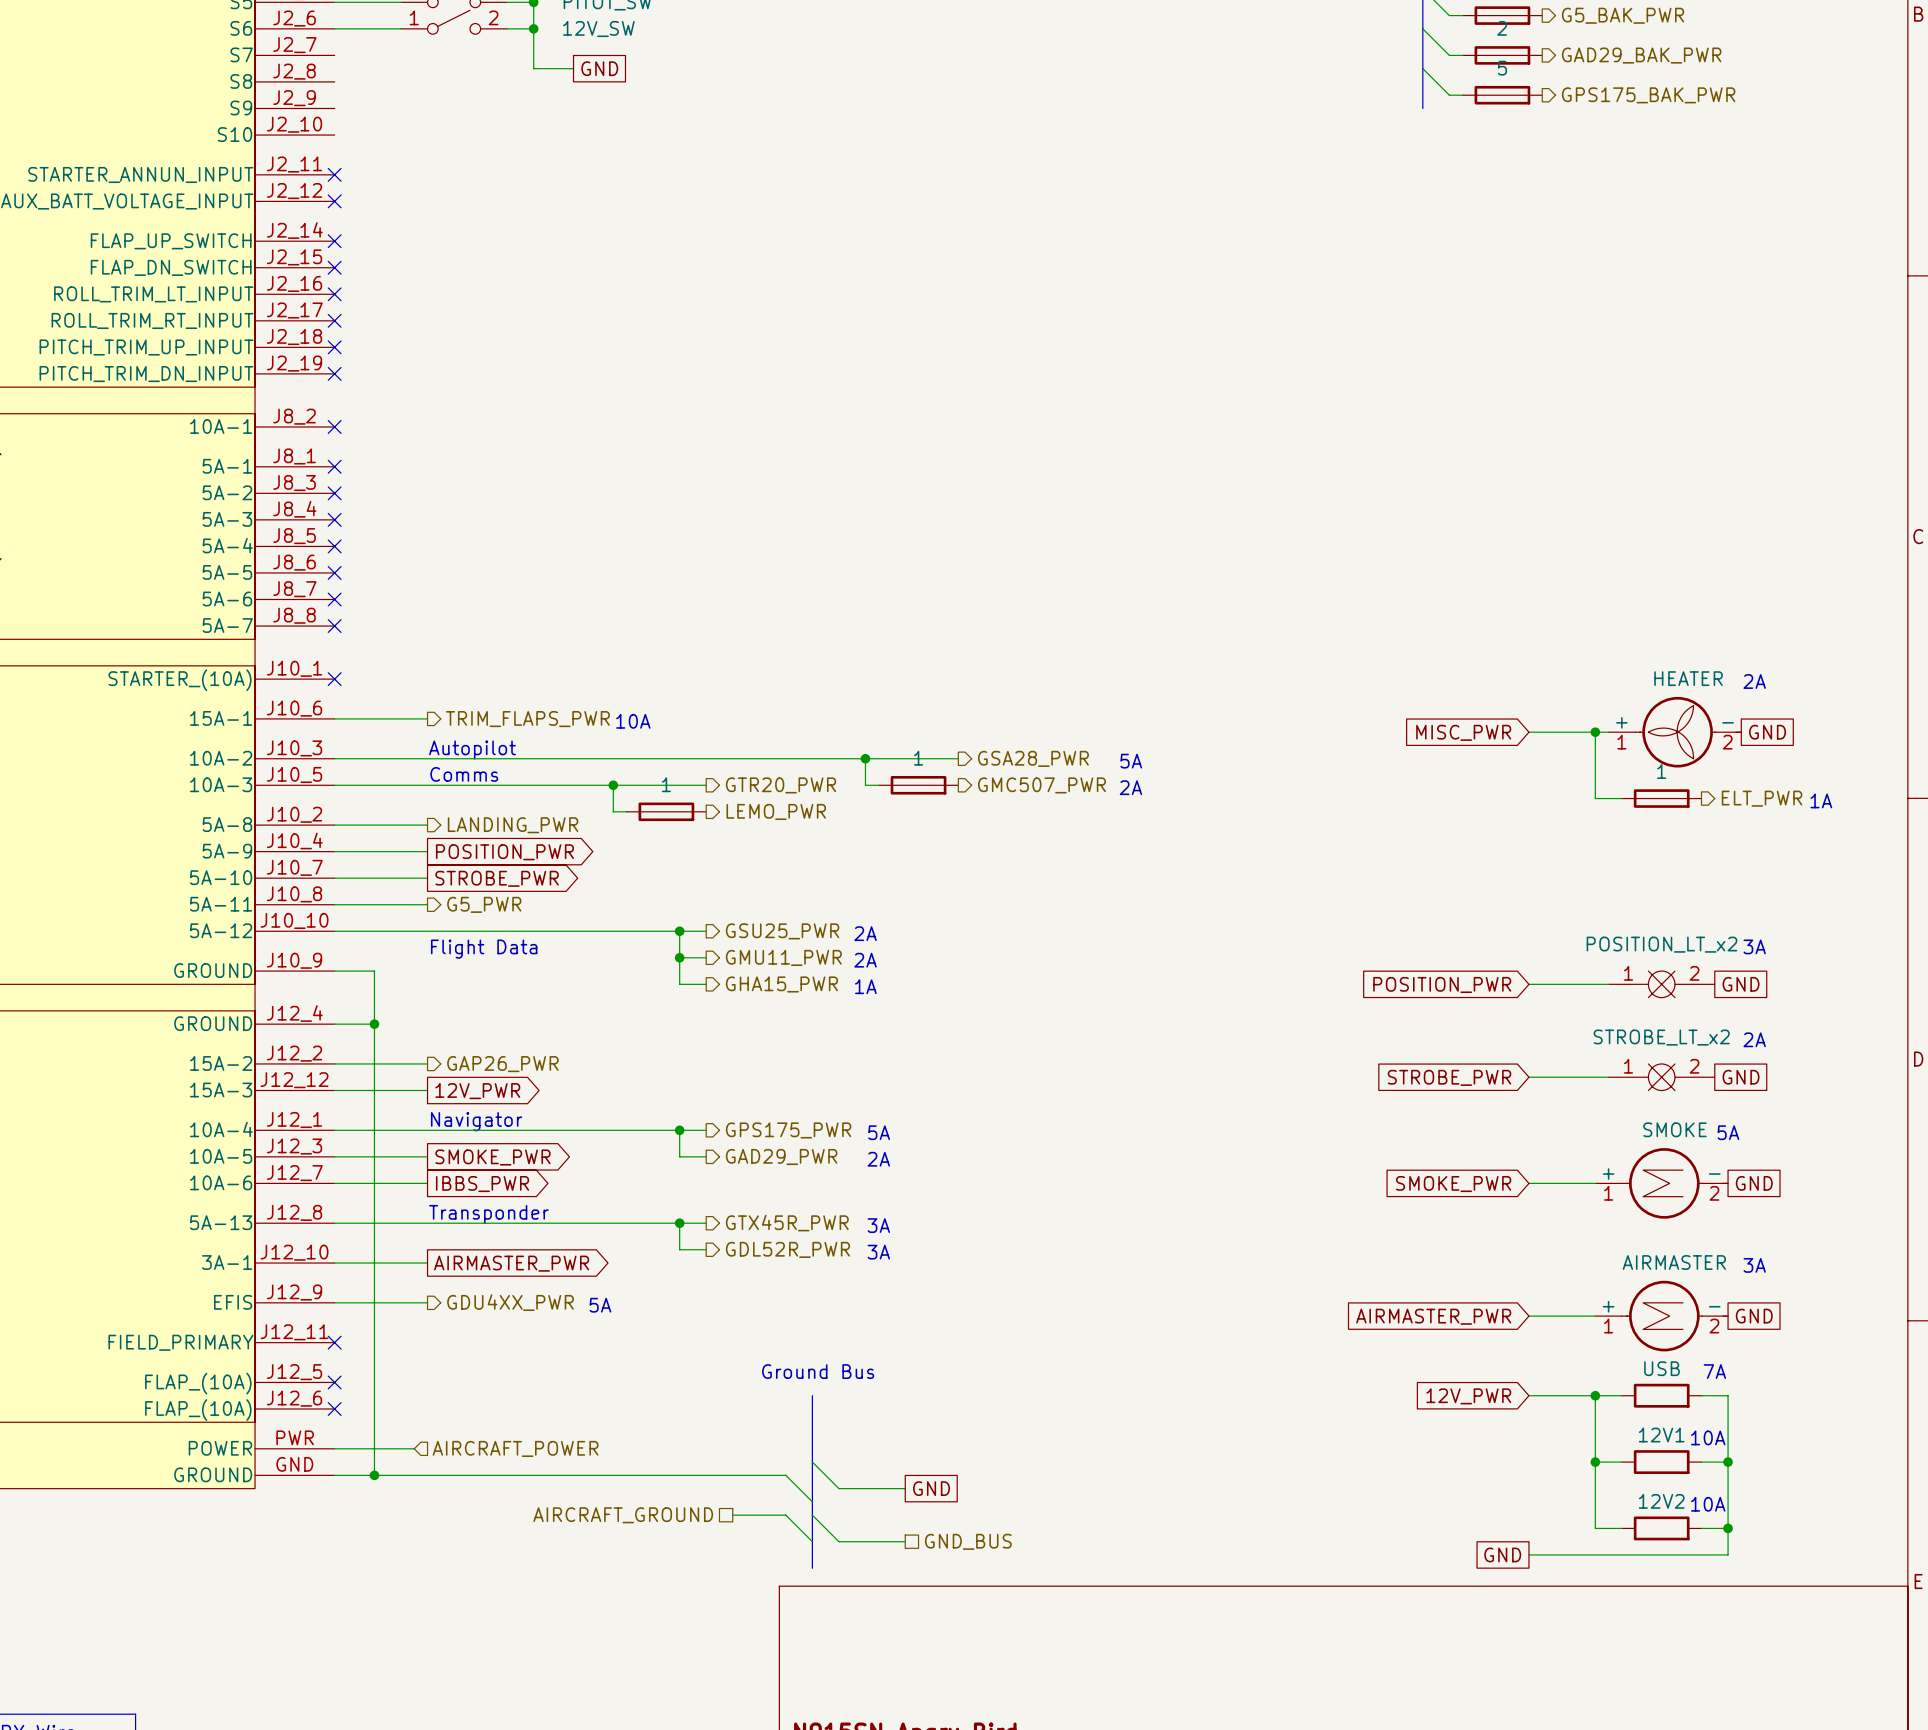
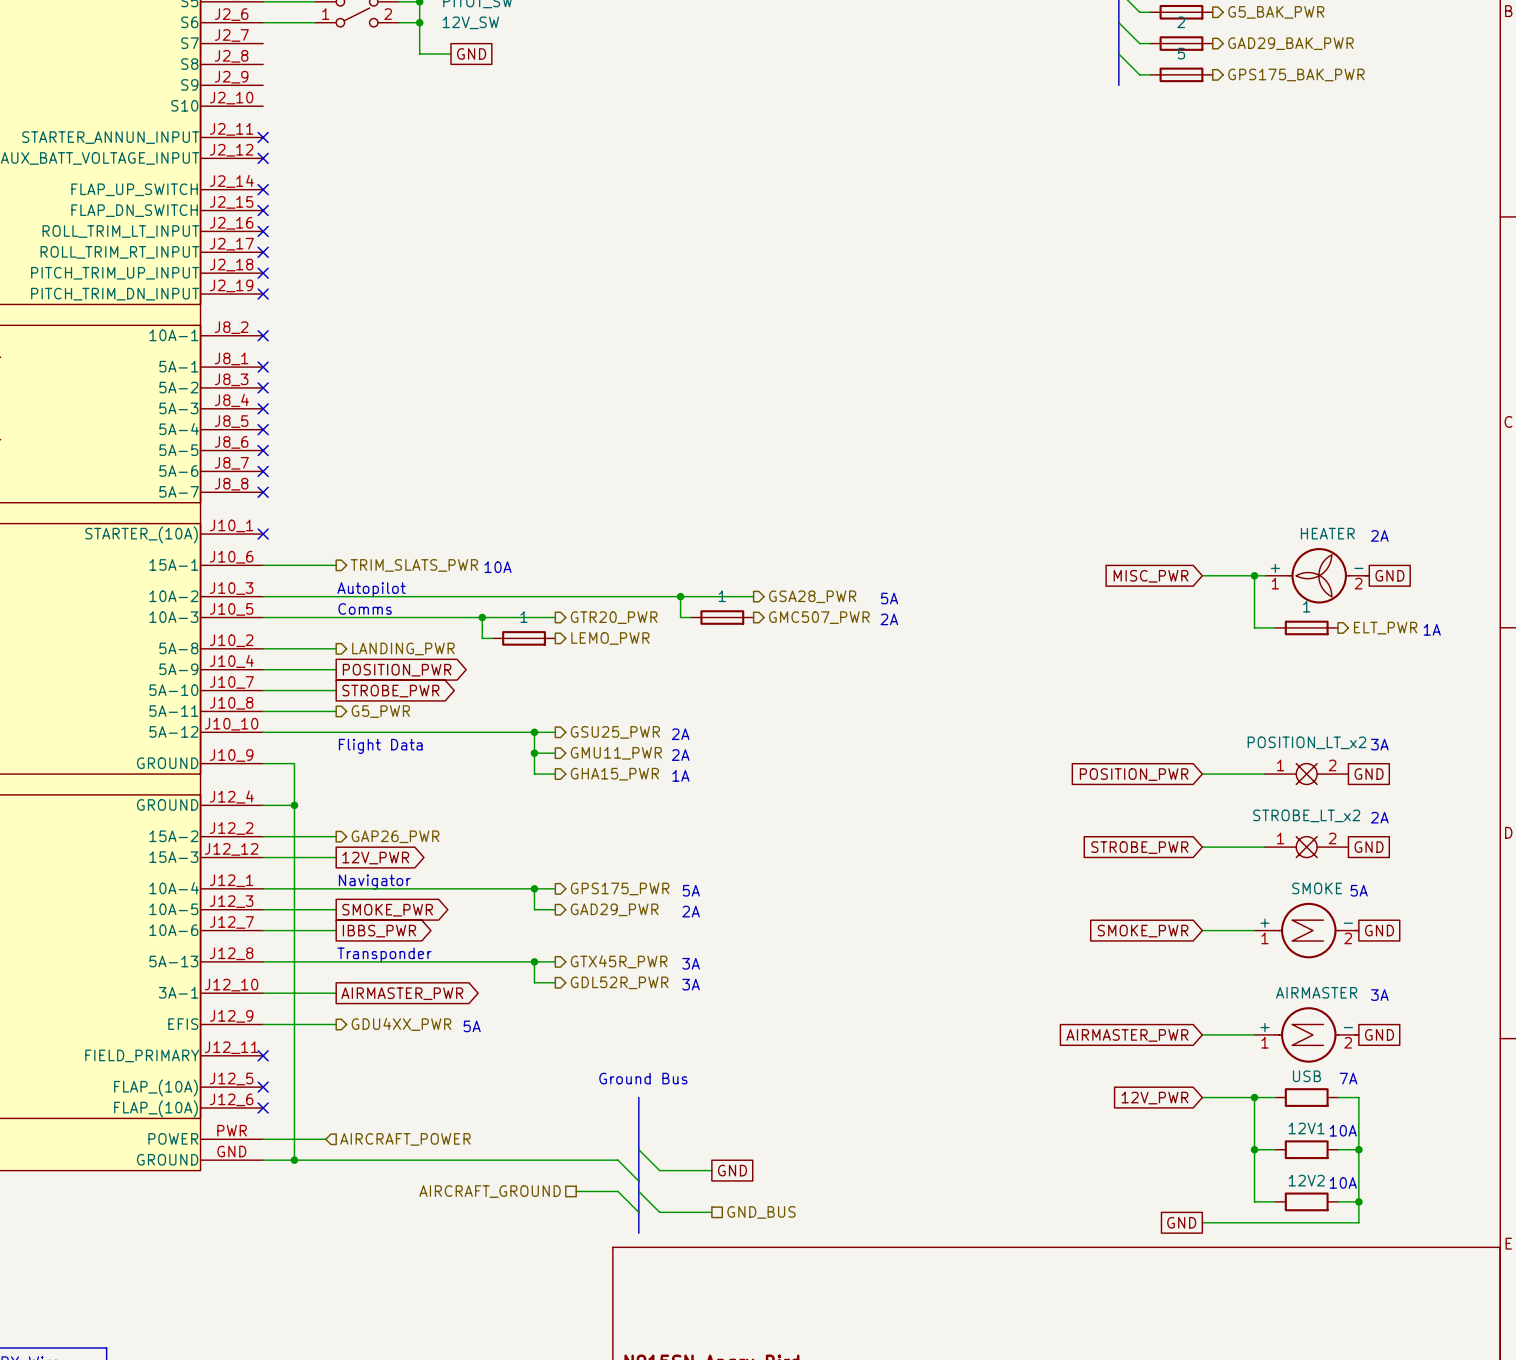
hierarchical label: TRIM_FLAPS_PWR (527, 719) -> TRIM_SLATS_PWR (414, 565)

